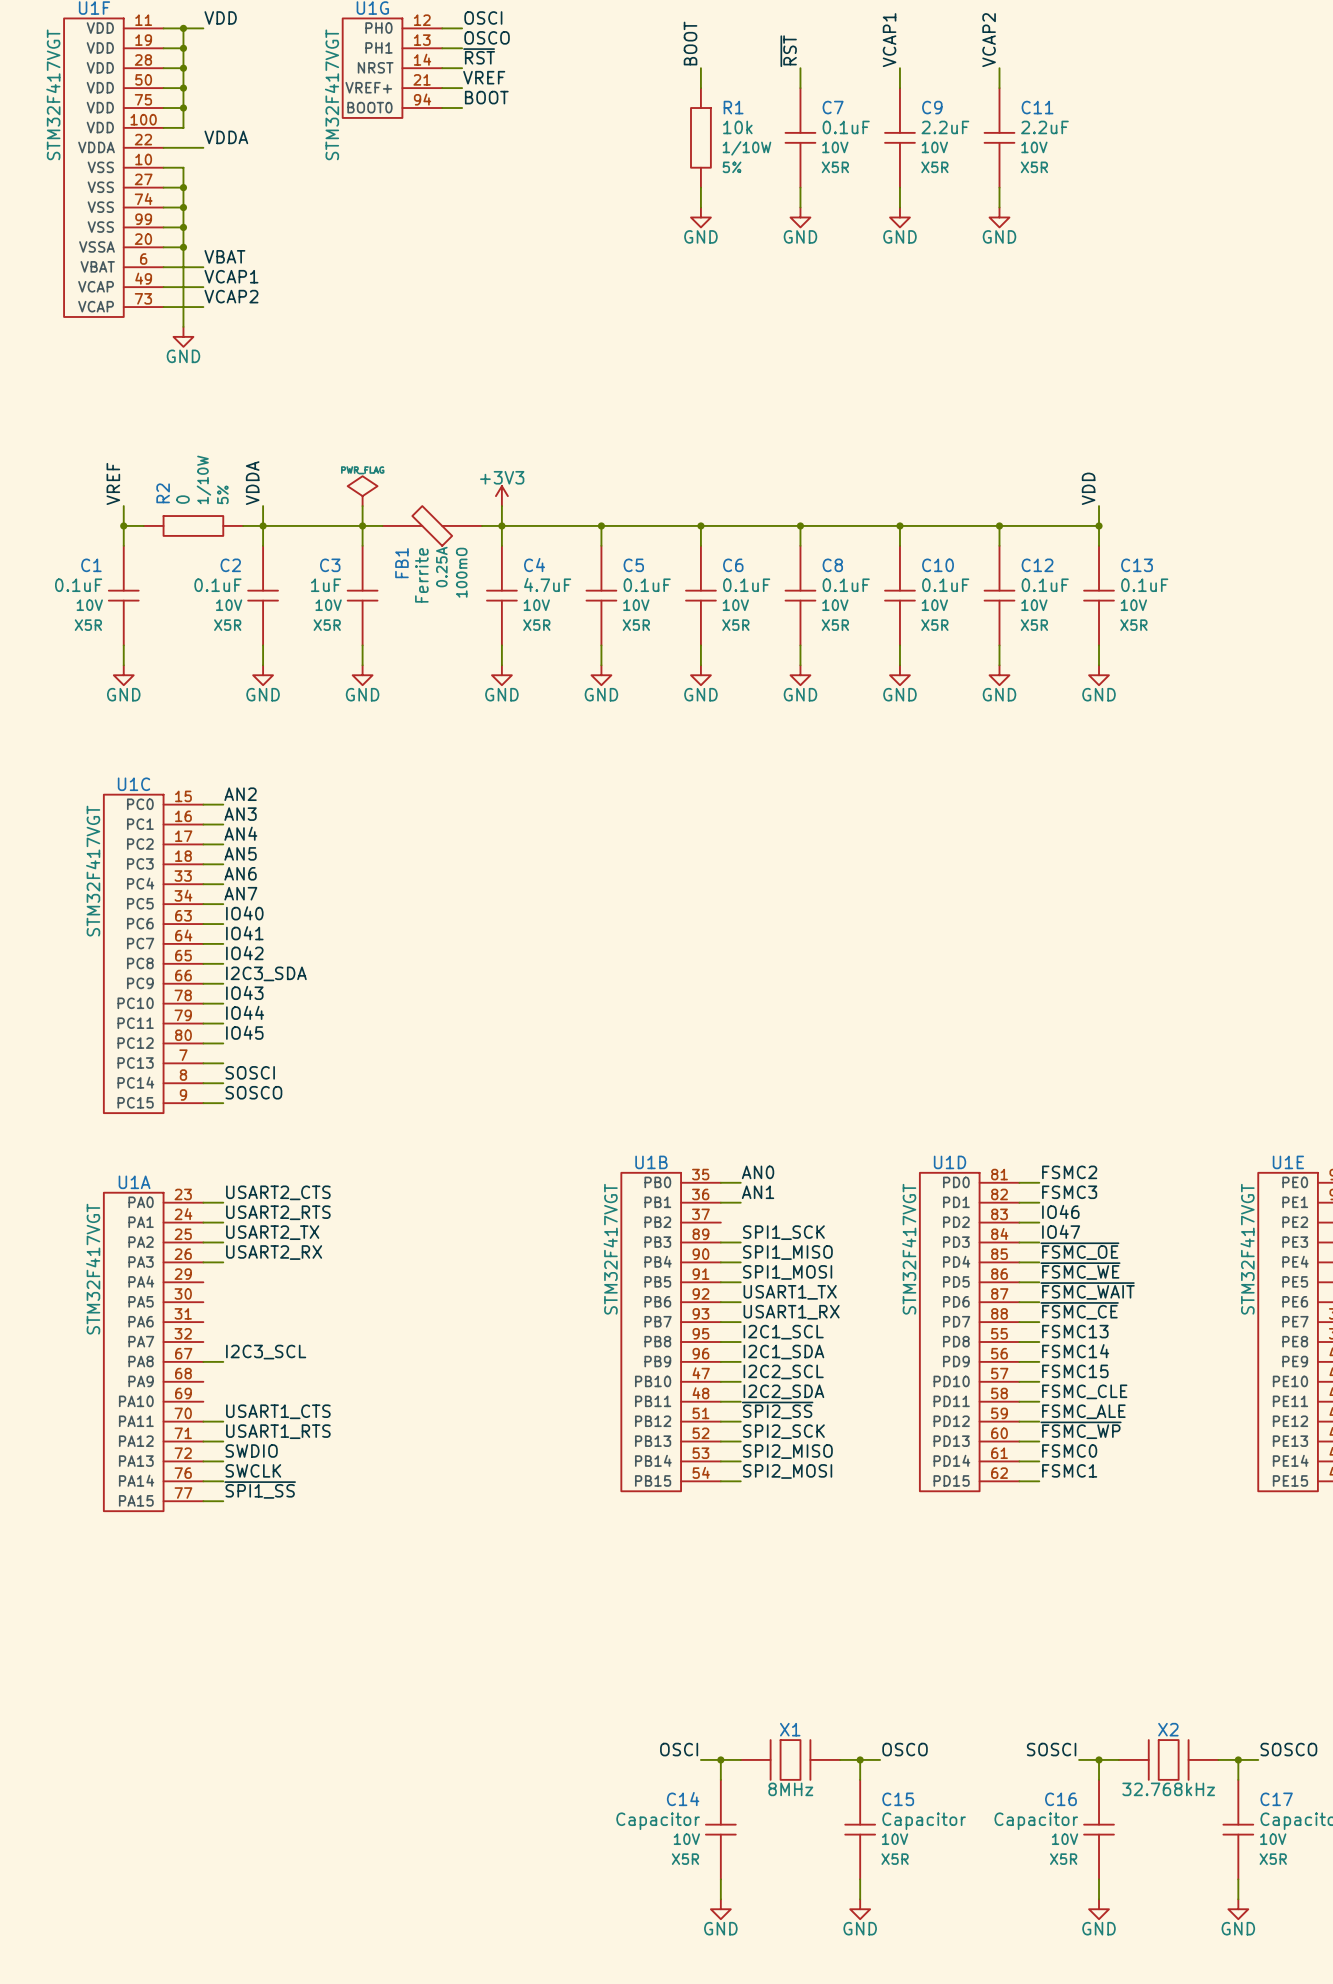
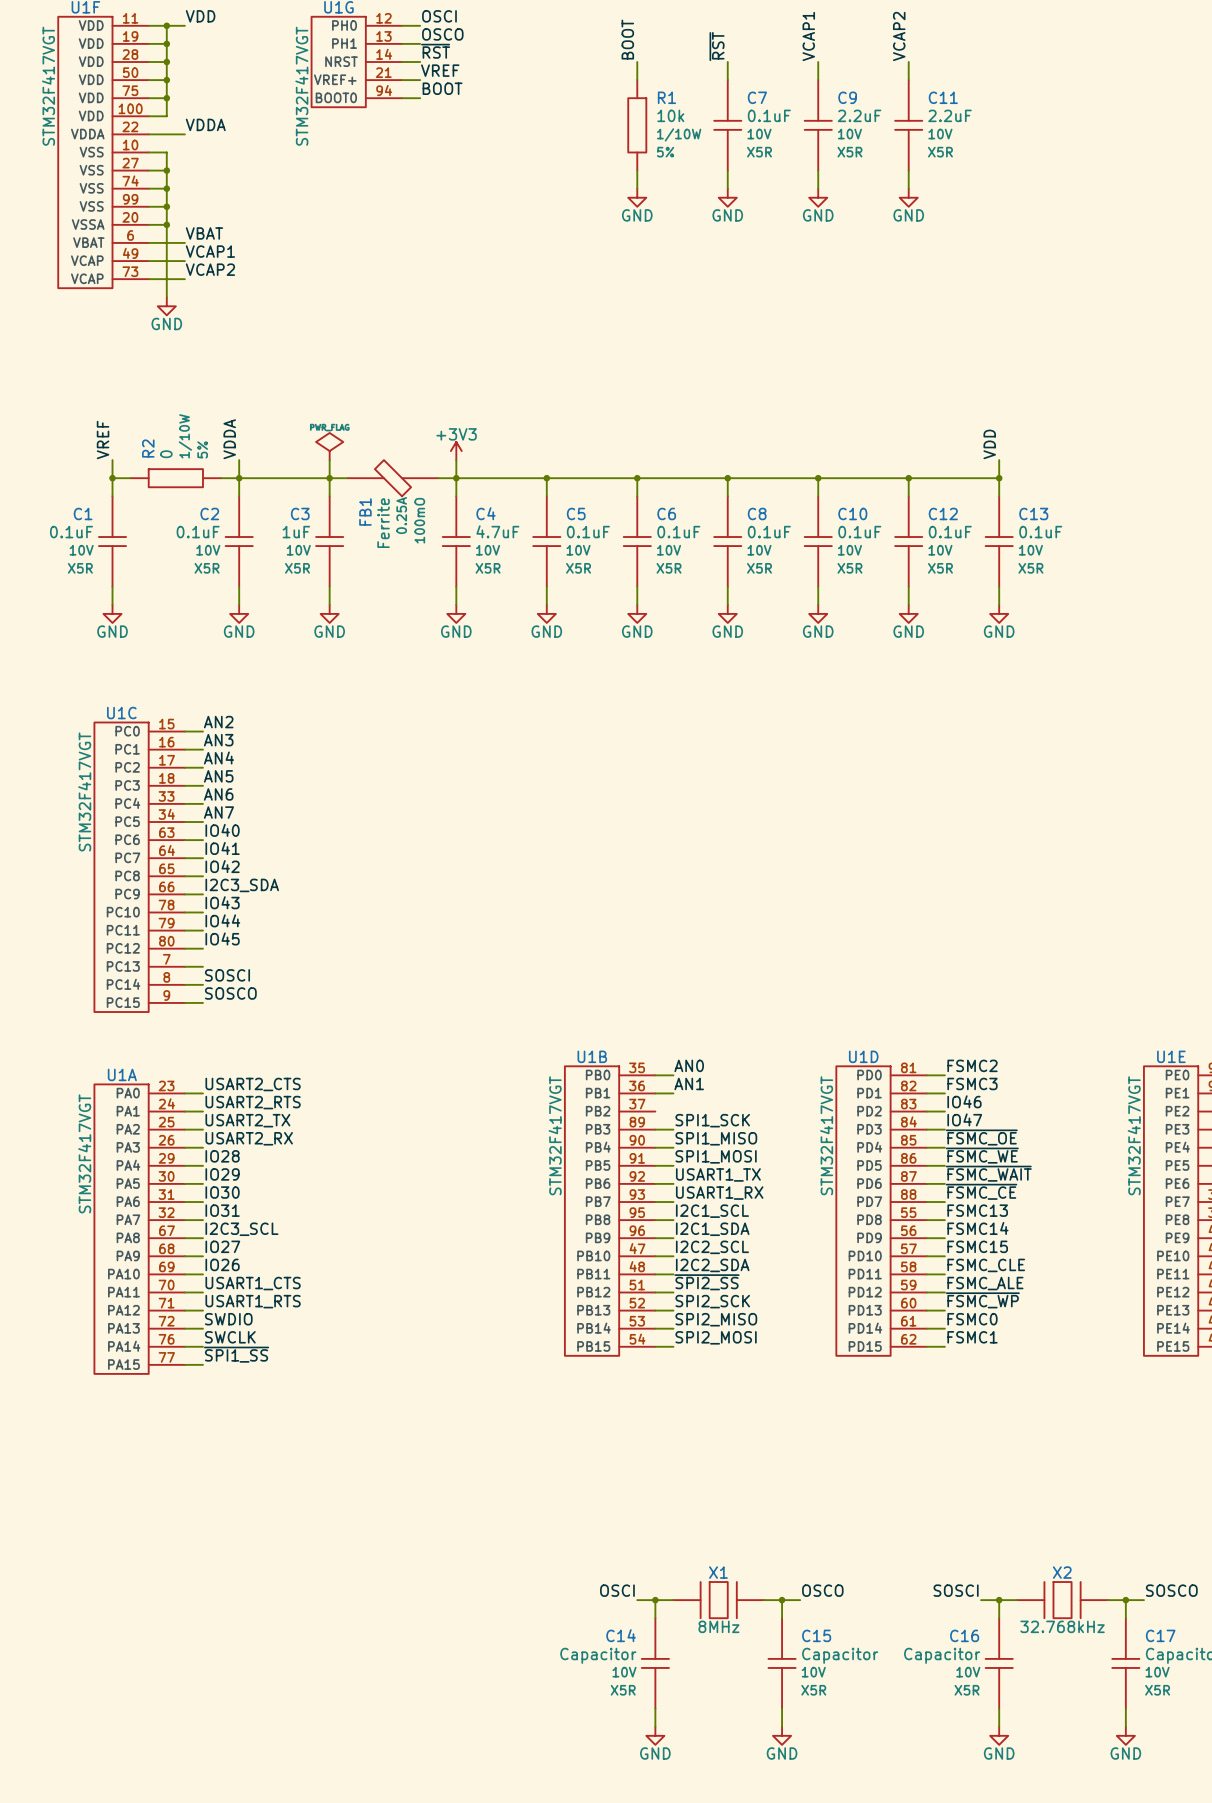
label: none -> IO28 (222, 1156)
wire: none -> (184, 1165) (202, 1165)
label: none -> IO29 (222, 1174)
wire: none -> (184, 1183) (202, 1183)
label: none -> IO30 (222, 1192)
wire: none -> (184, 1202) (202, 1202)
label: none -> IO31 (222, 1210)
wire: none -> (184, 1220) (202, 1220)
label: none -> IO27 (222, 1246)
wire: none -> (184, 1256) (202, 1256)
label: none -> IO26 (222, 1264)
wire: none -> (184, 1274) (202, 1274)

